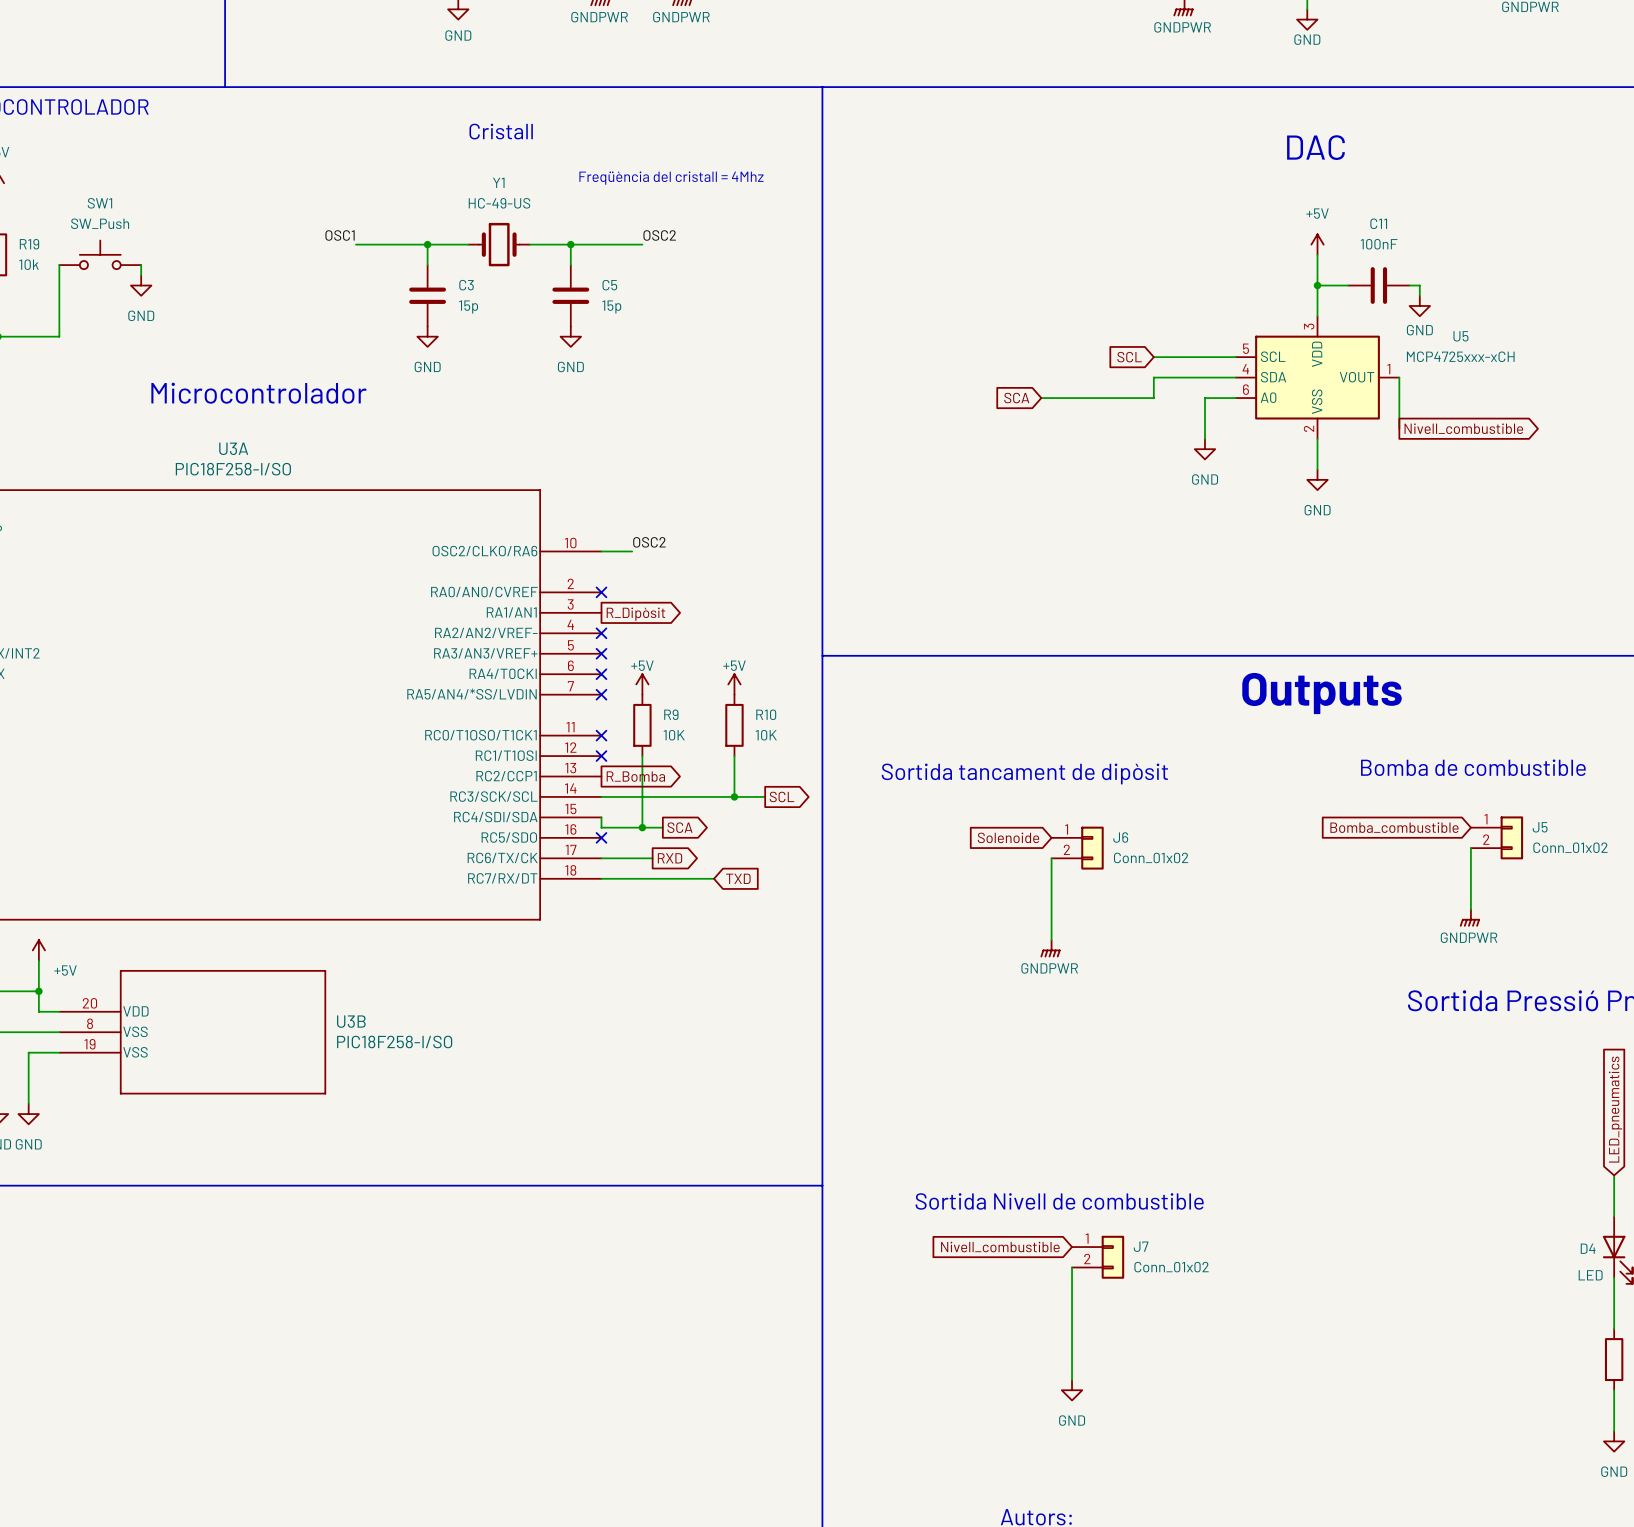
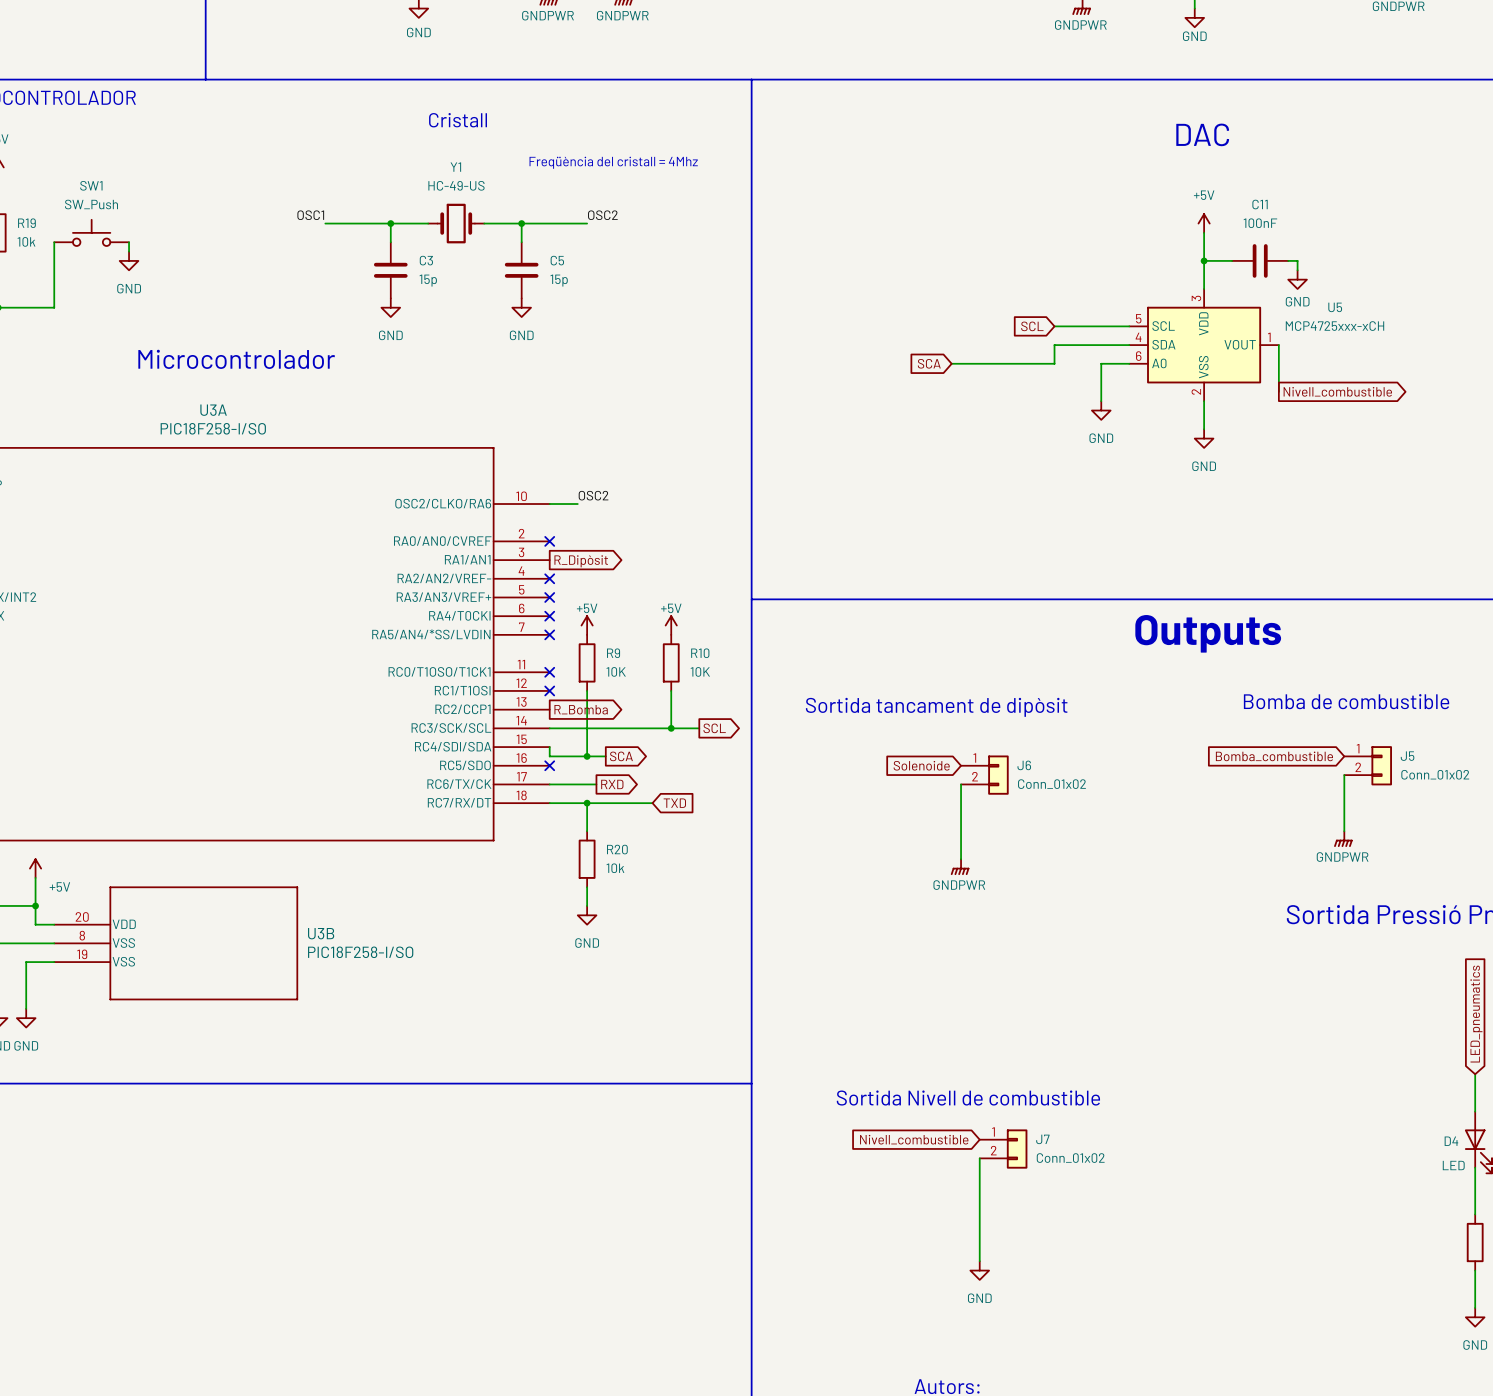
wire: none -> (587, 803) (587, 831)
junction: none -> (587, 803)
R20: none -> 10k (587, 859)
wire: none -> (587, 887) (587, 905)
power symbol: none -> GND (587, 915)

